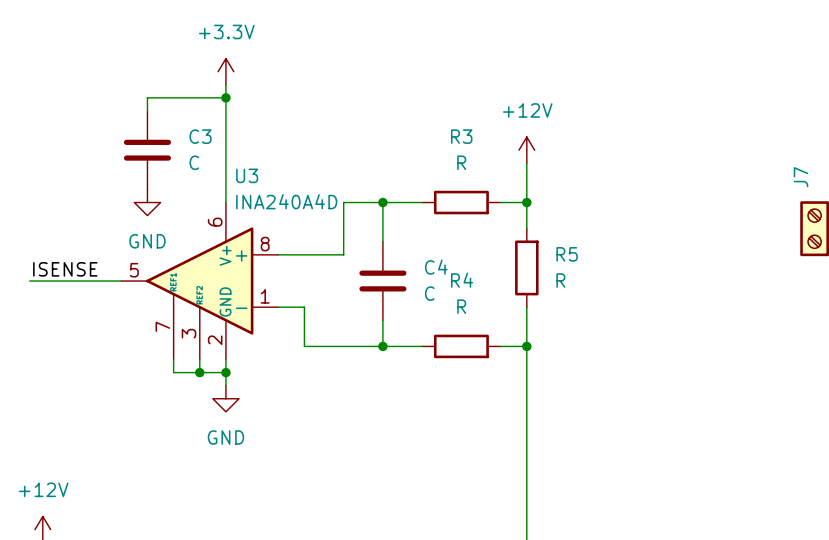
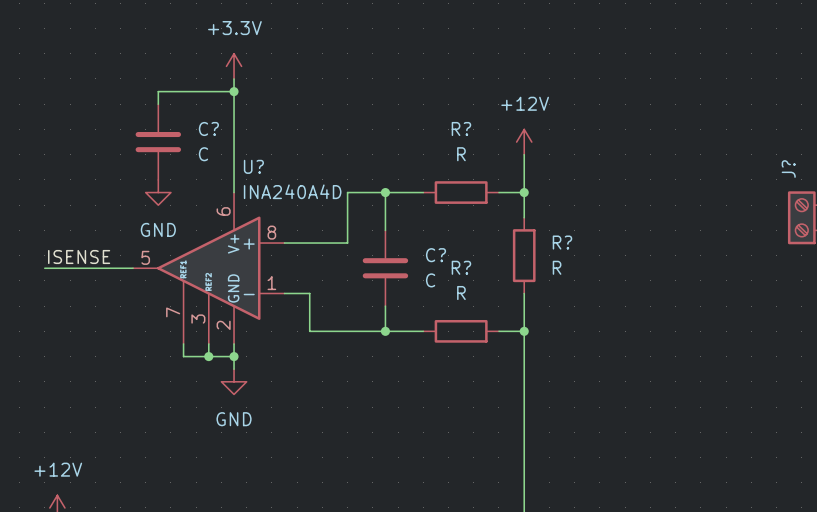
C3 name: C3 (200, 136) -> C? (208, 128)
R3 name: R3 (461, 136) -> R? (461, 128)
U3 name: U3 (247, 175) -> U? (253, 166)
J7 name: J7 (801, 177) -> J? (788, 169)
R5 name: R5 (567, 254) -> R? (562, 242)
C4 name: C4 (436, 267) -> C? (436, 255)
R4 name: R4 (462, 280) -> R? (461, 267)

